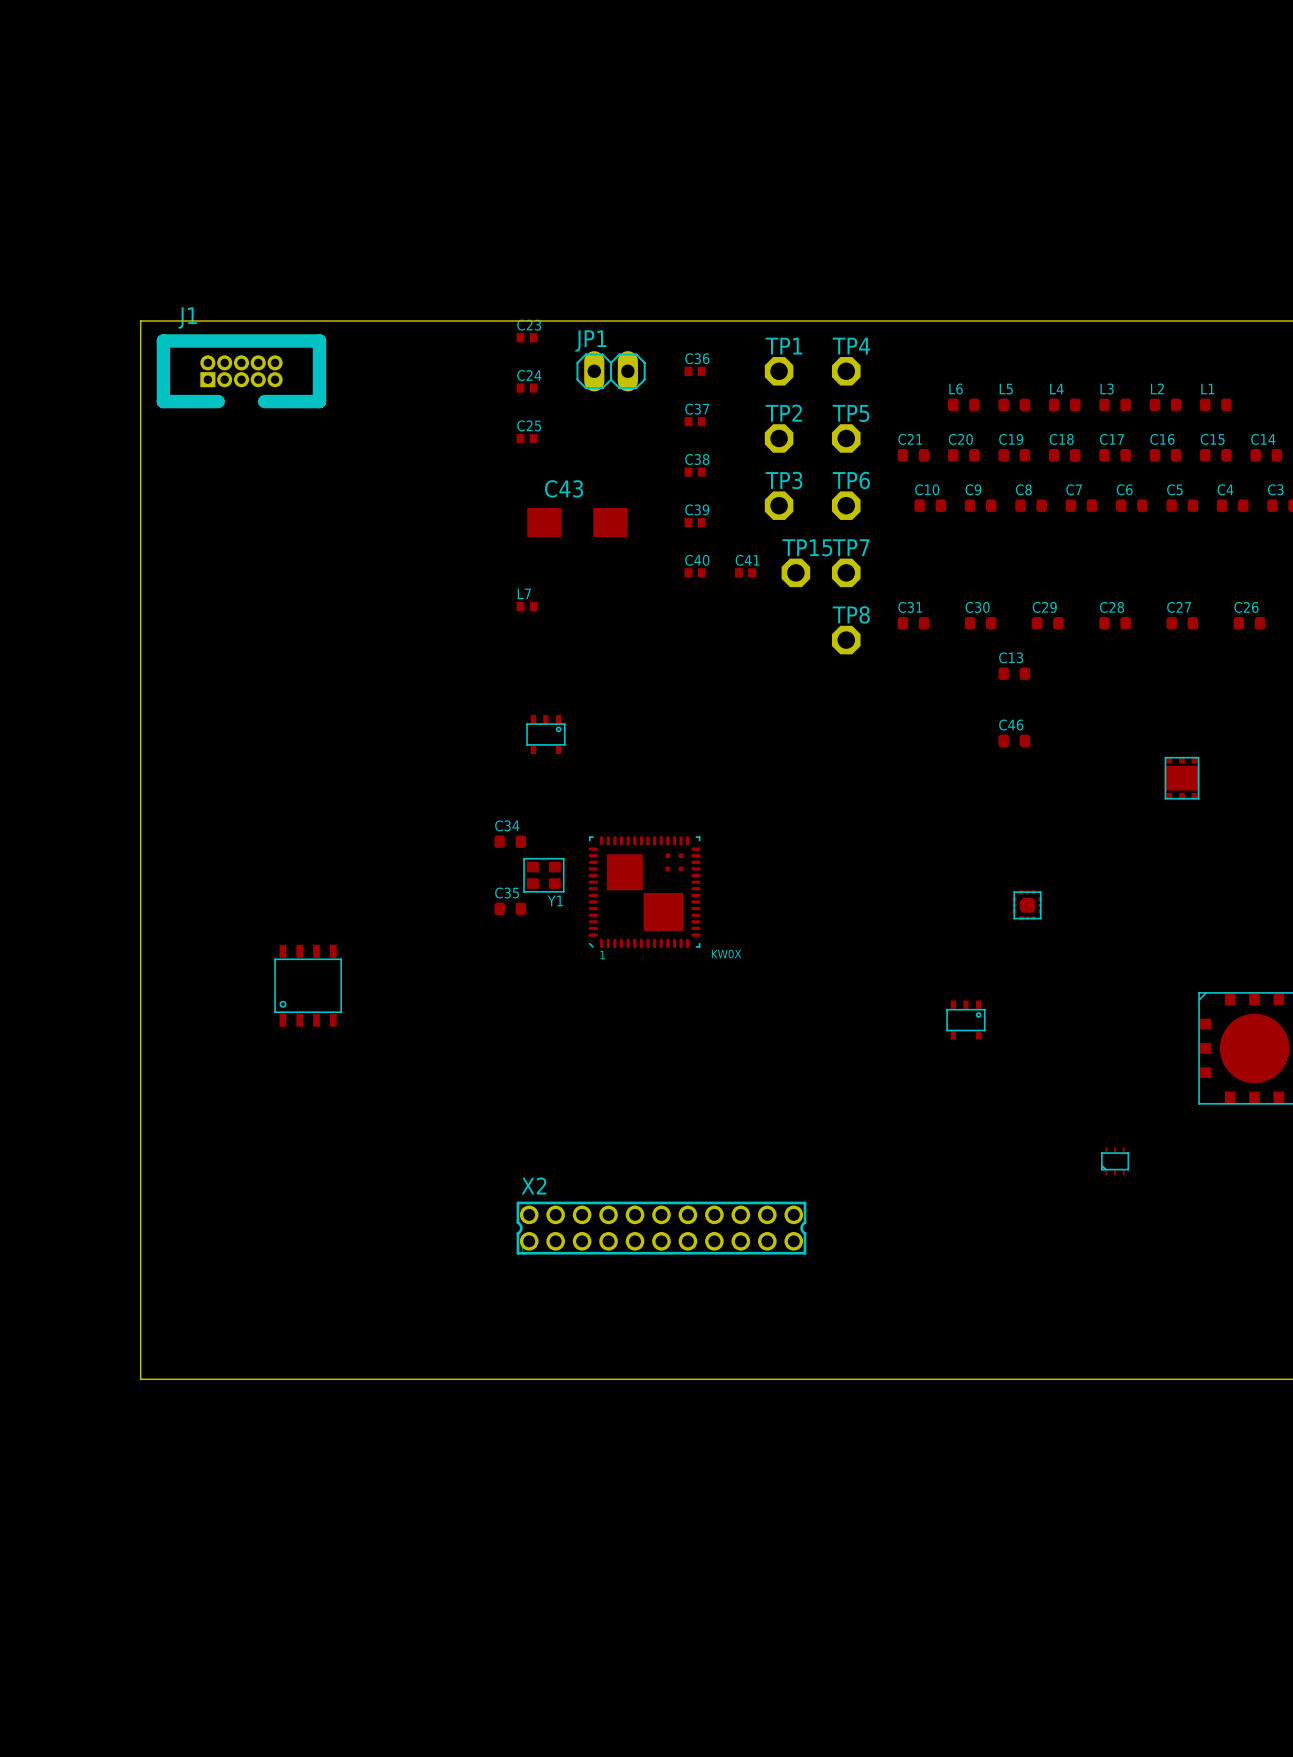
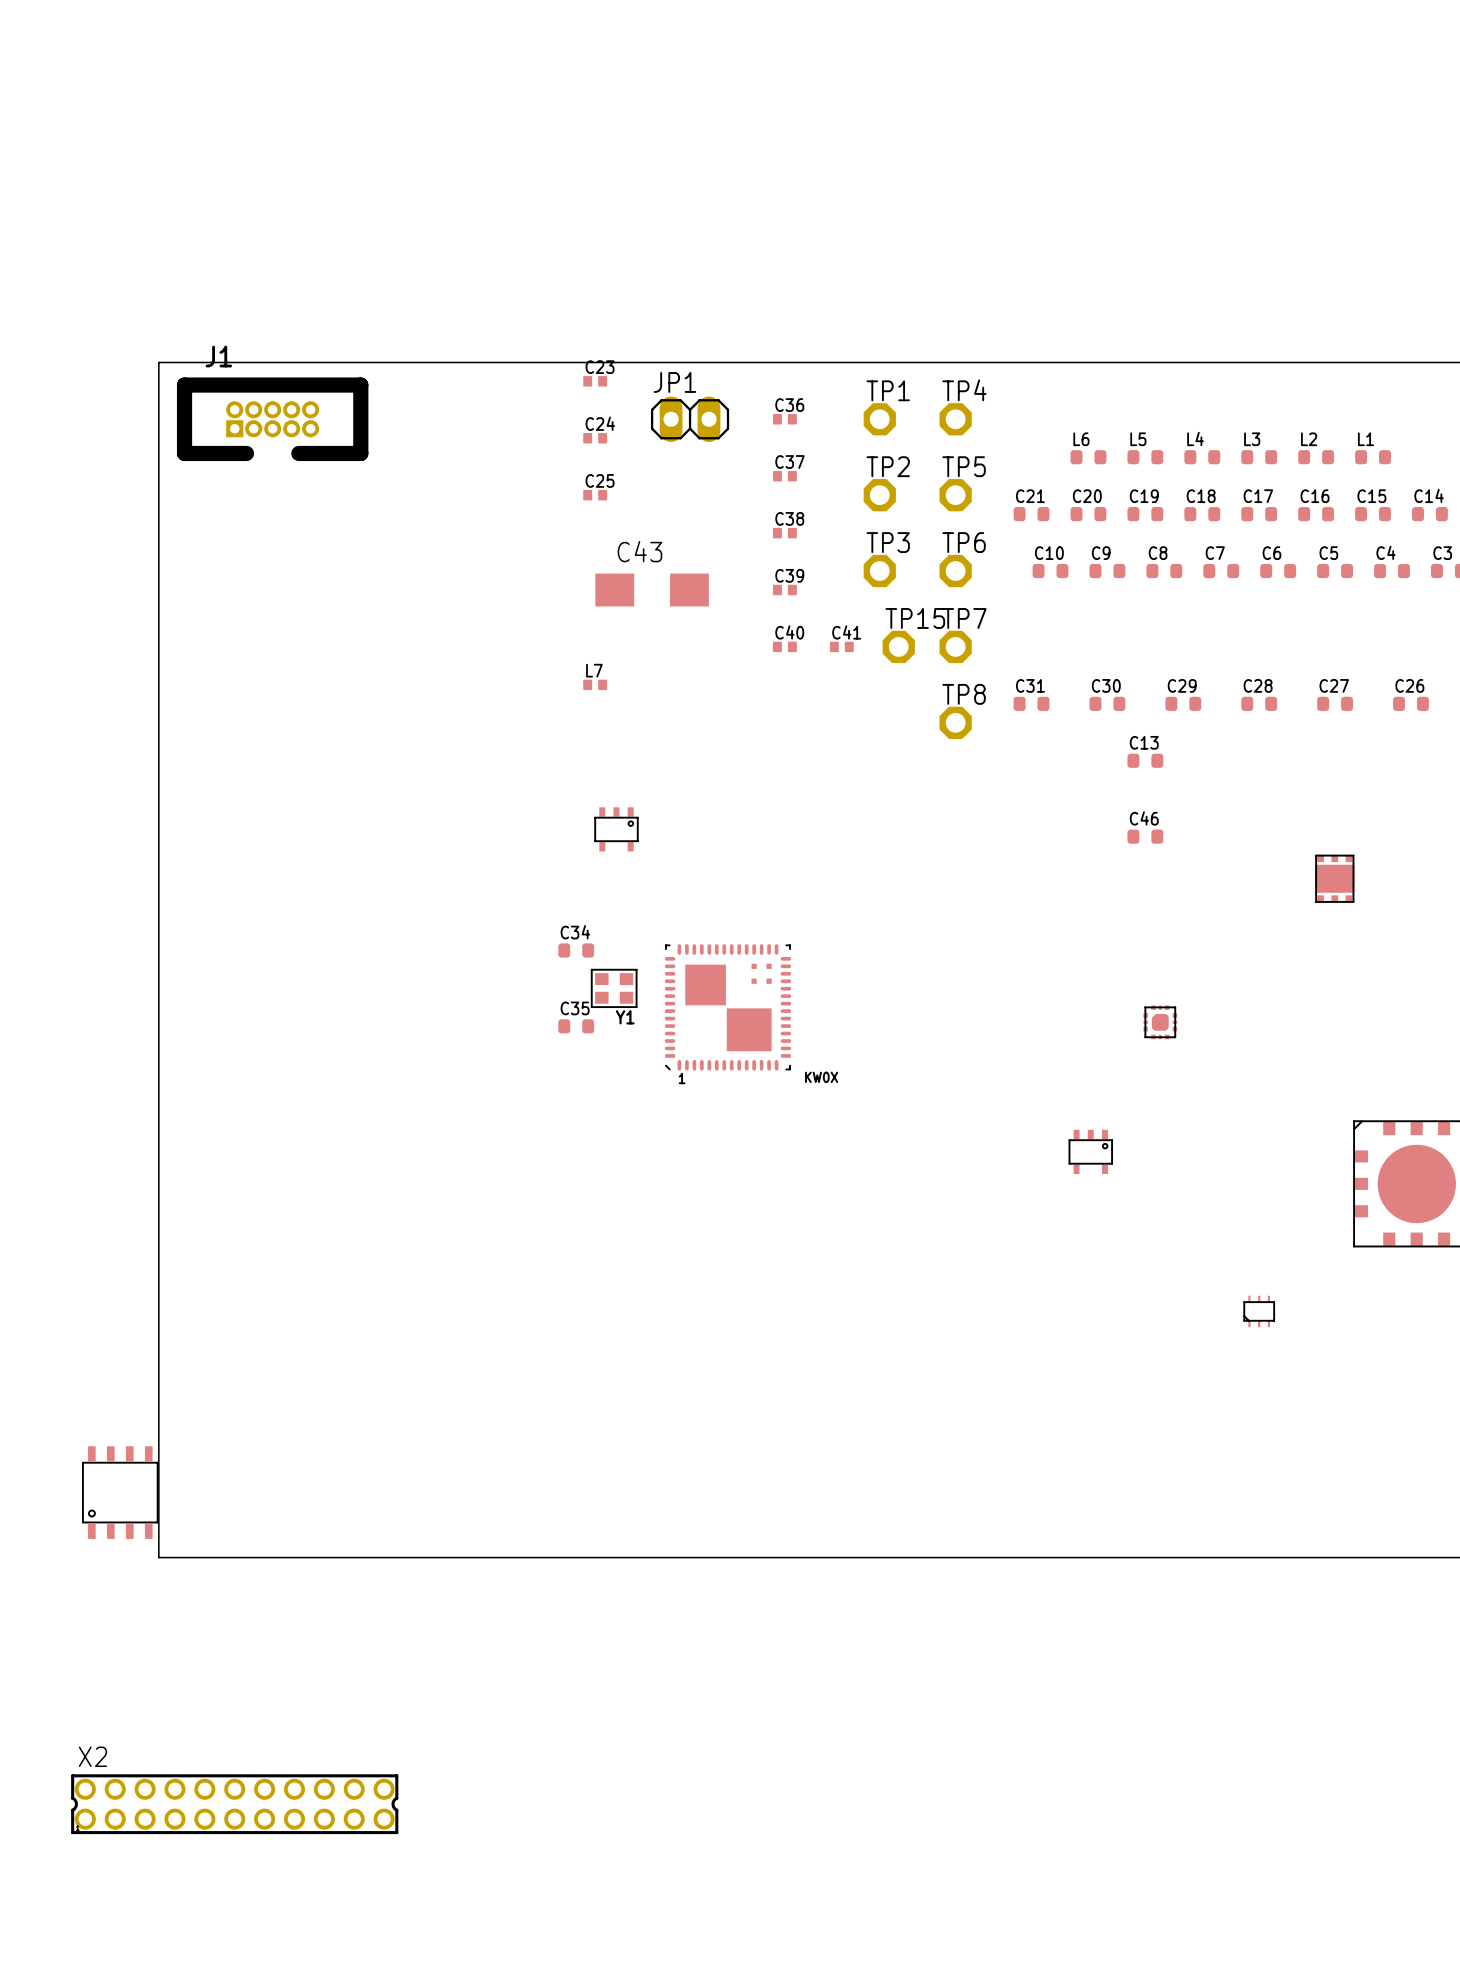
part: (308, 985) -> none
X2 position: (661, 1228) -> (234, 1804)
part: none -> (120, 1492)

